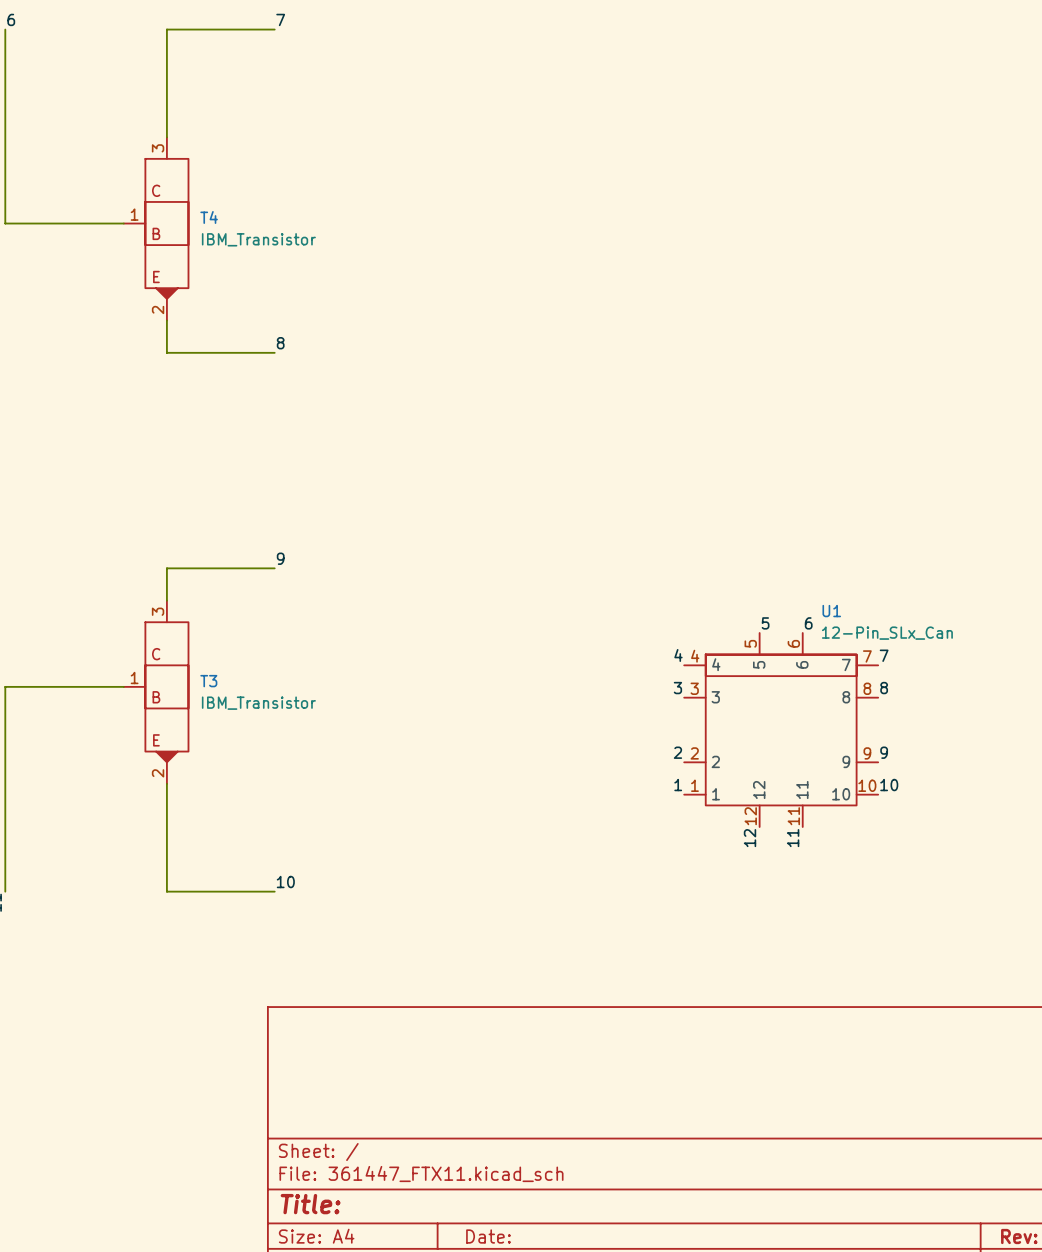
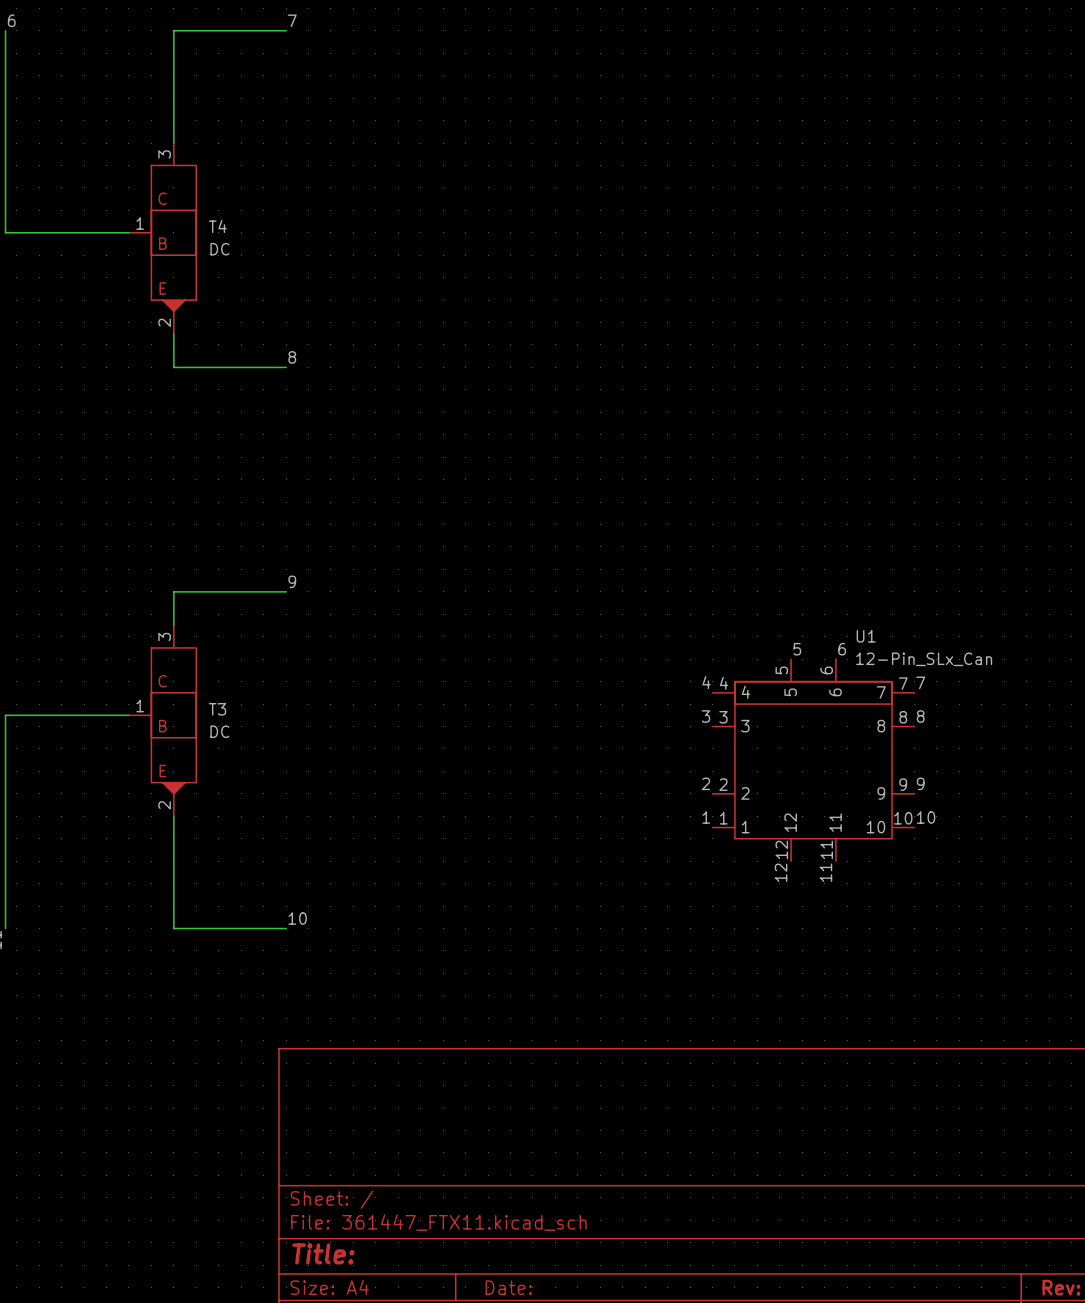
T4 value: IBM_Transistor (258, 239) -> DC (219, 249)
T3 value: IBM_Transistor (258, 703) -> DC (219, 731)

